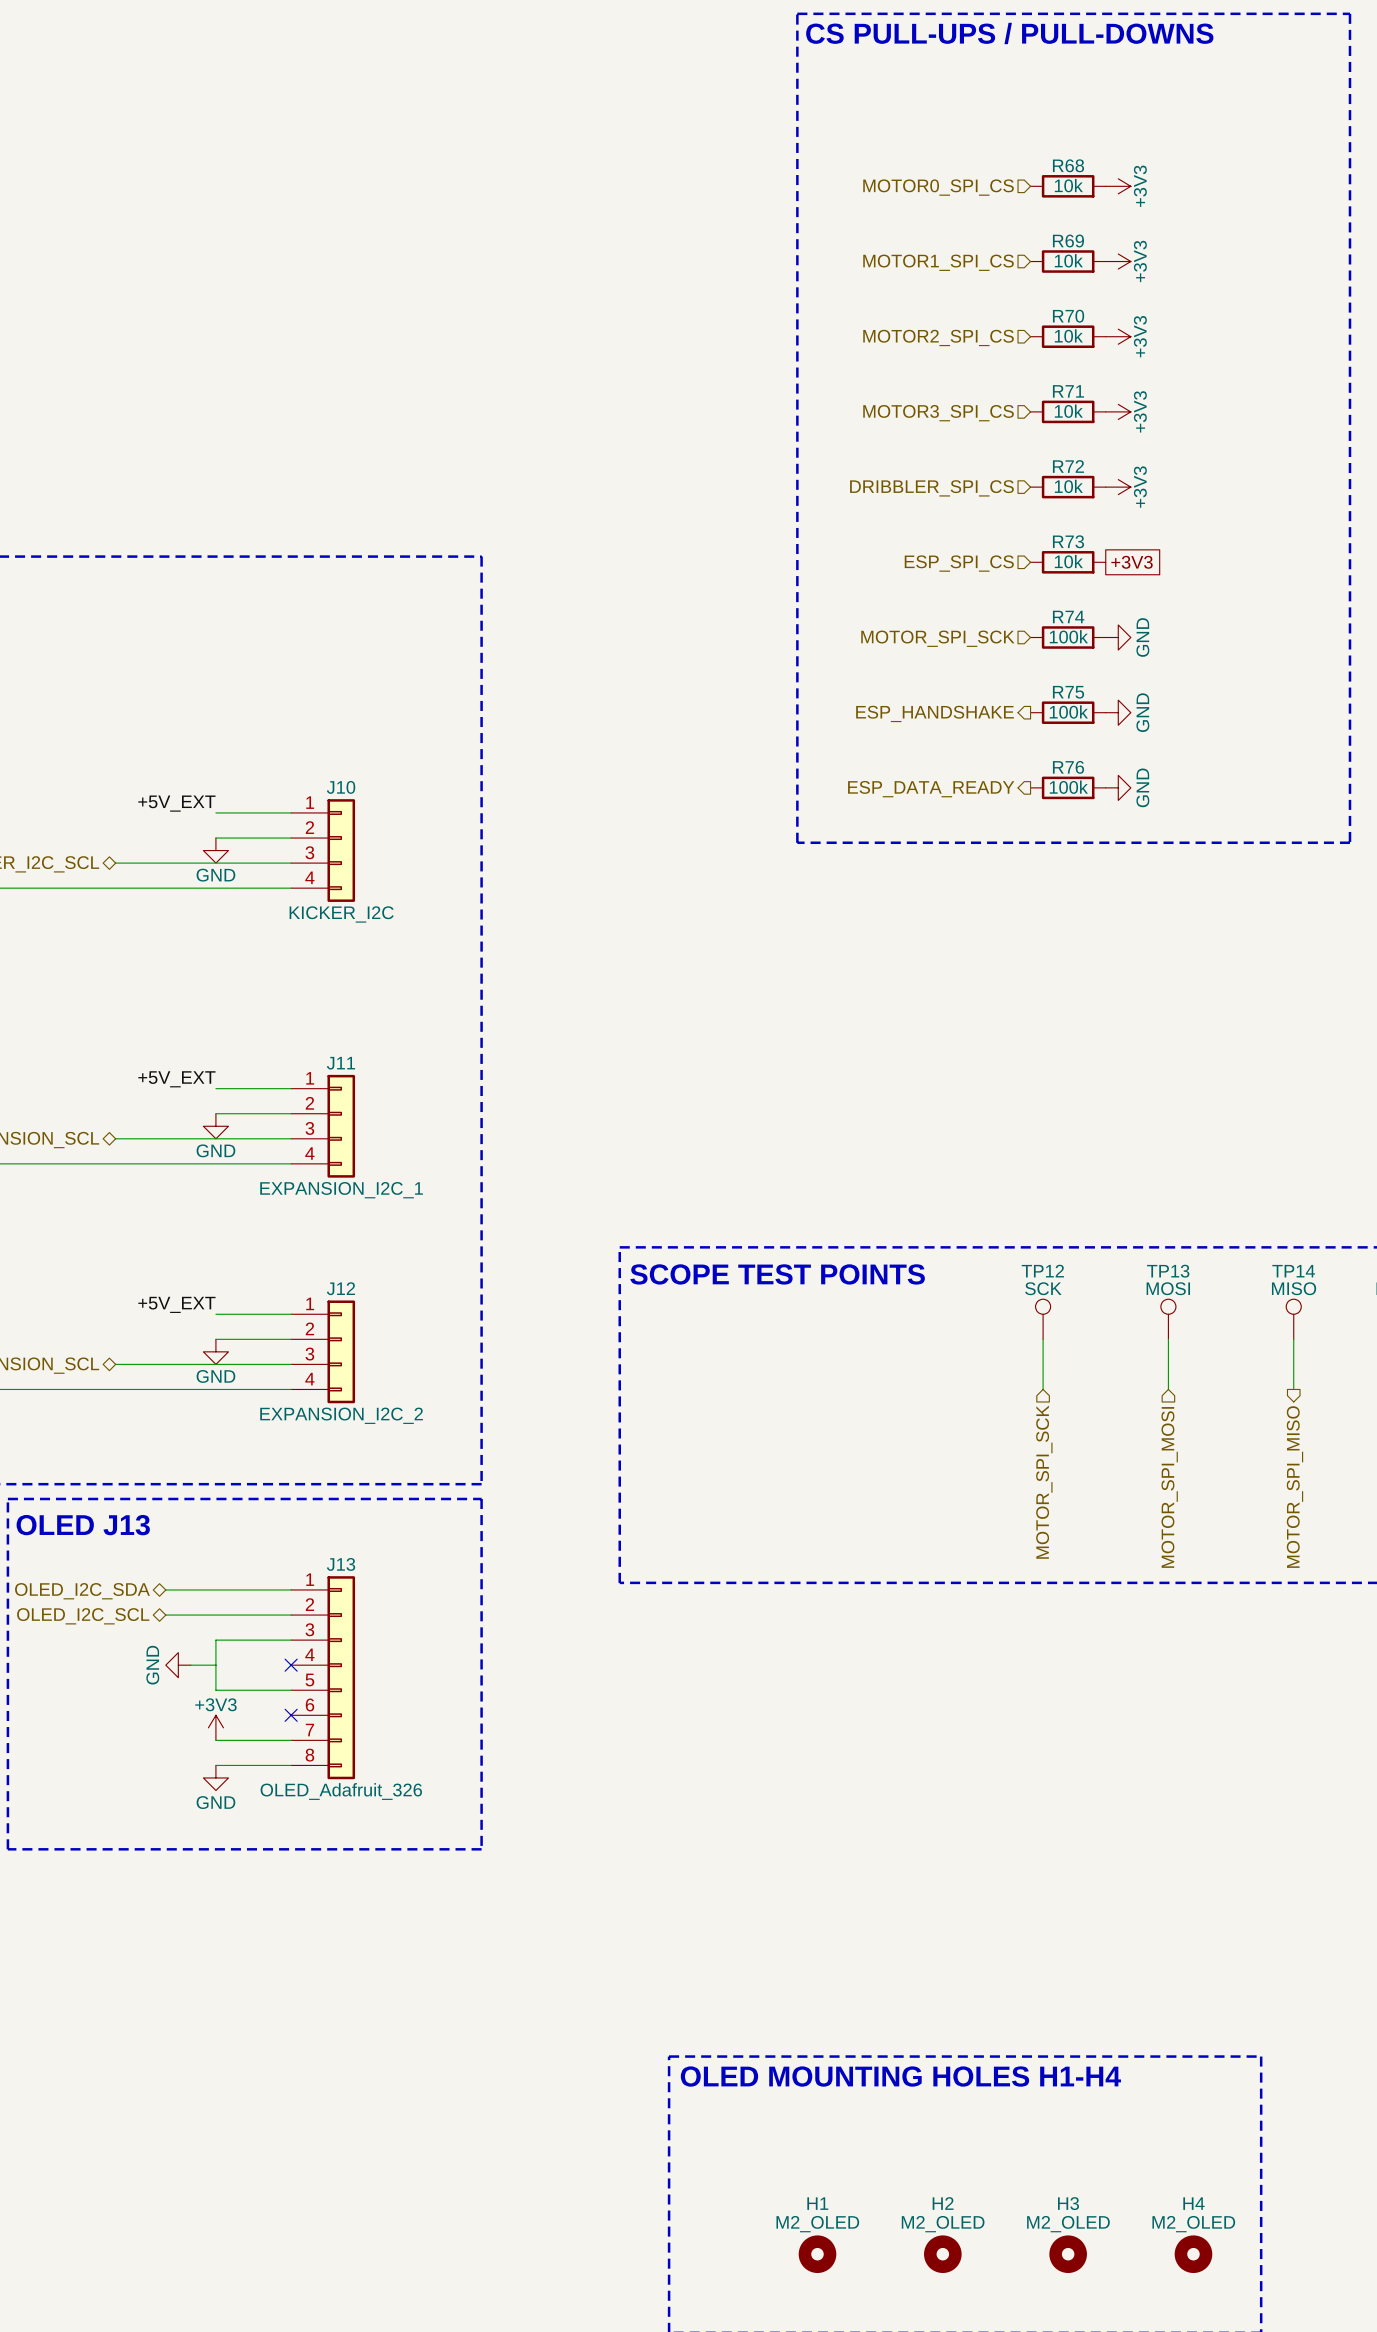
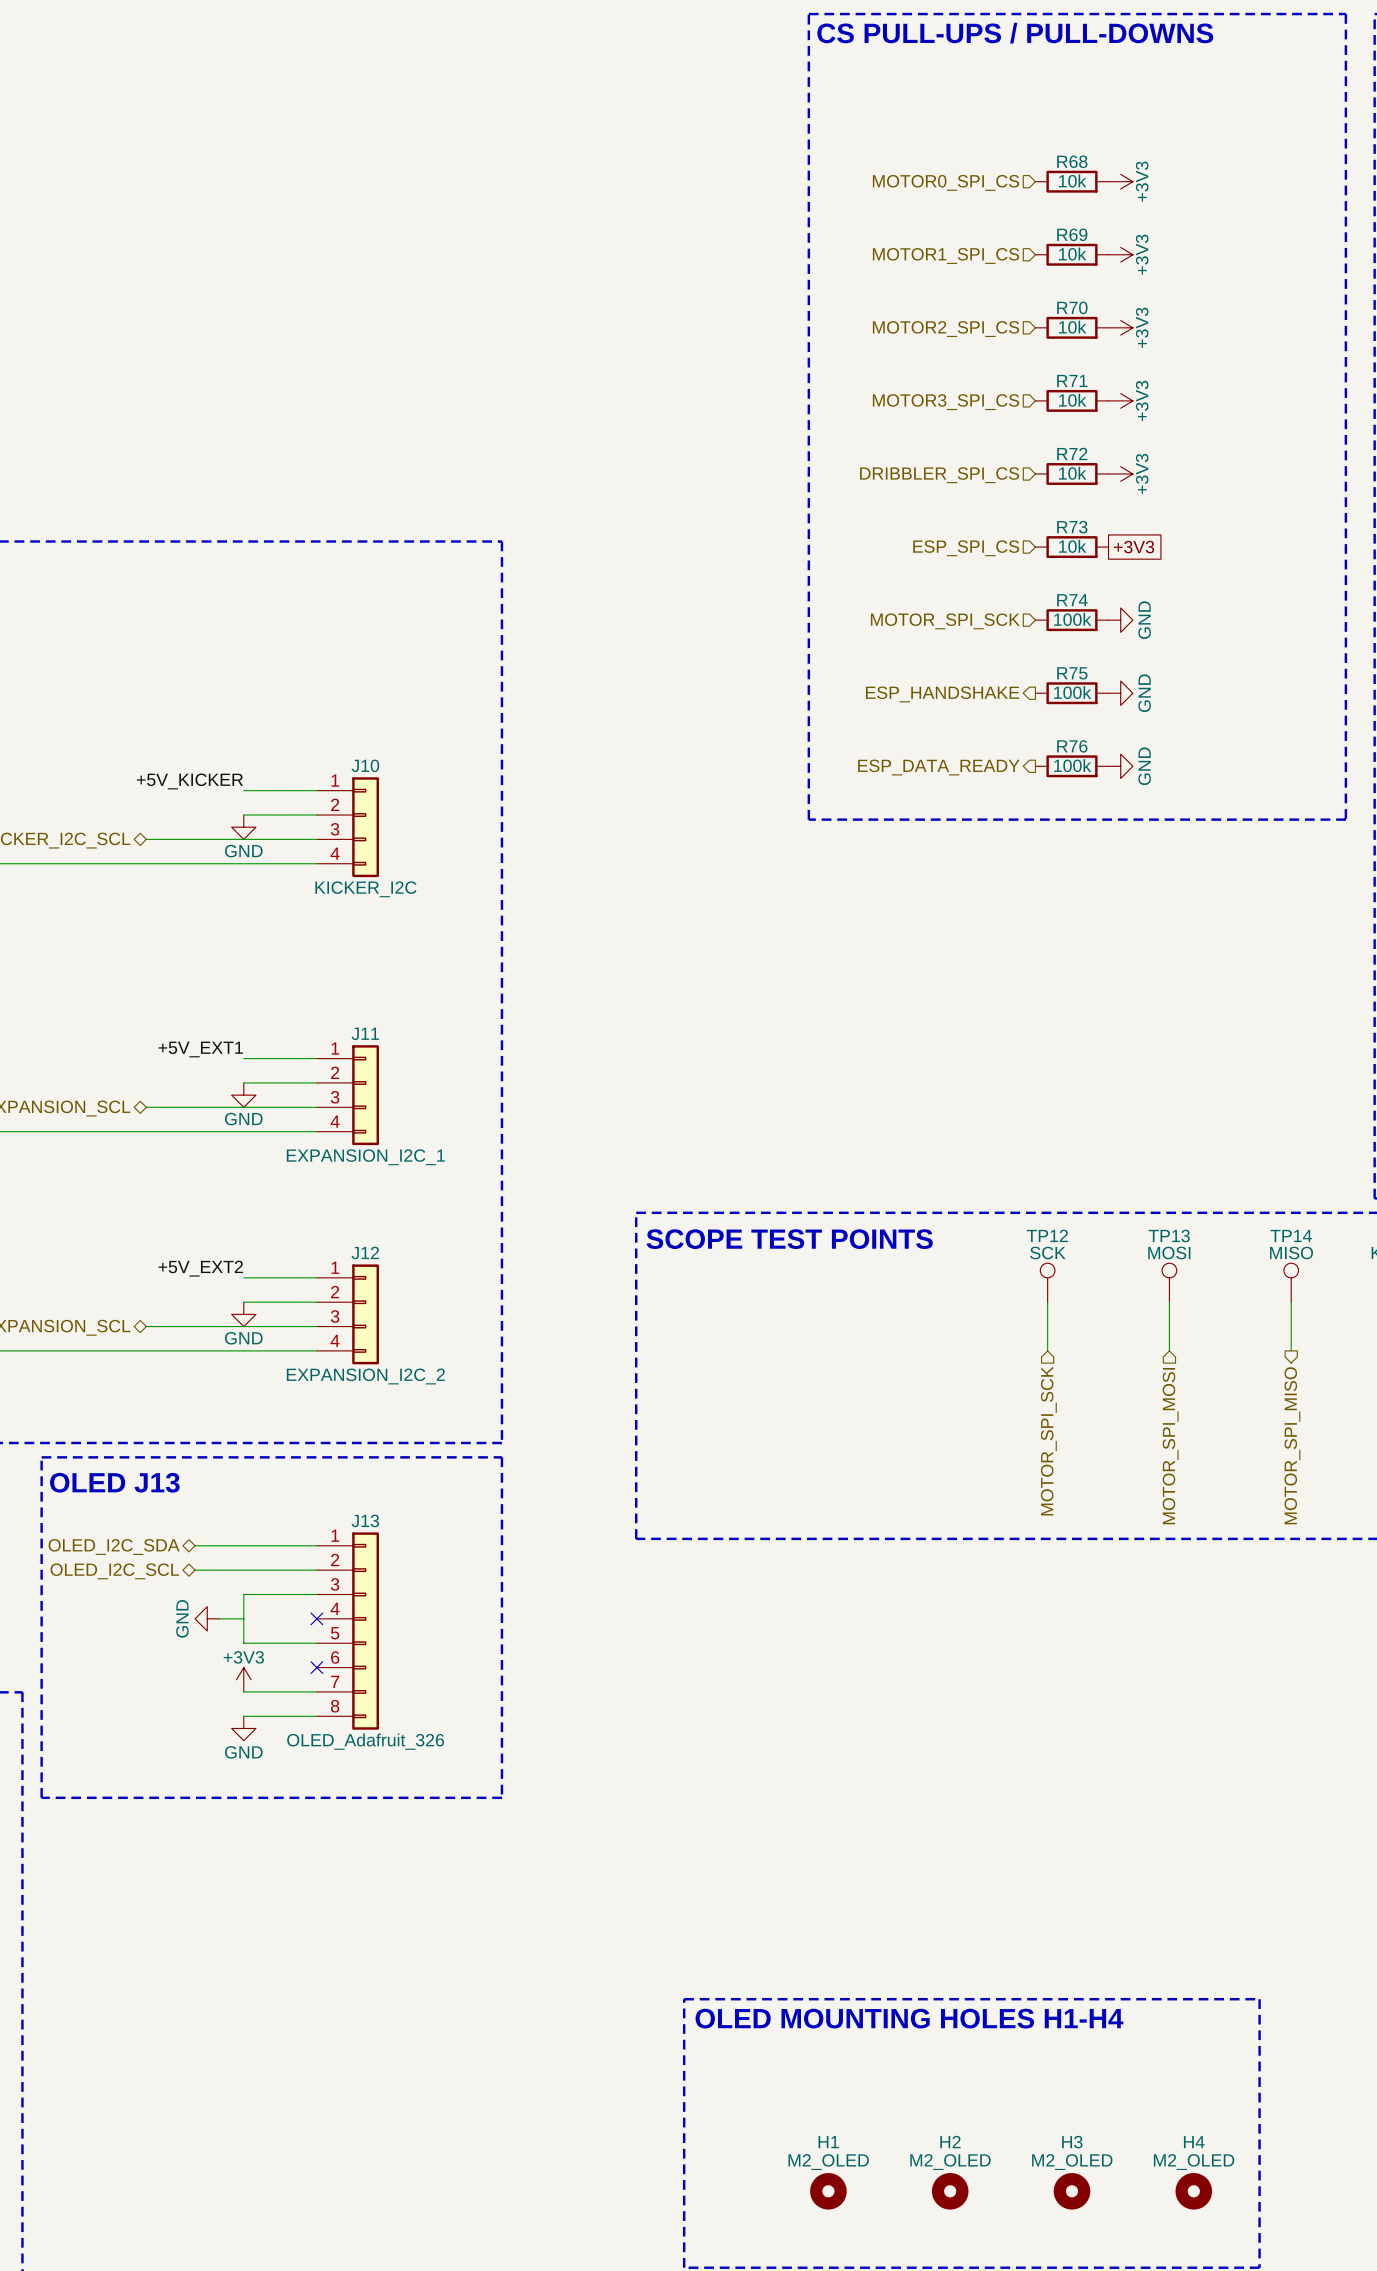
label: +5V_EXT (176, 803) -> +5V_KICKER (189, 781)
label: +5V_EXT (176, 1079) -> +5V_EXT1 (200, 1049)
label: +5V_EXT (176, 1304) -> +5V_EXT2 (200, 1268)

